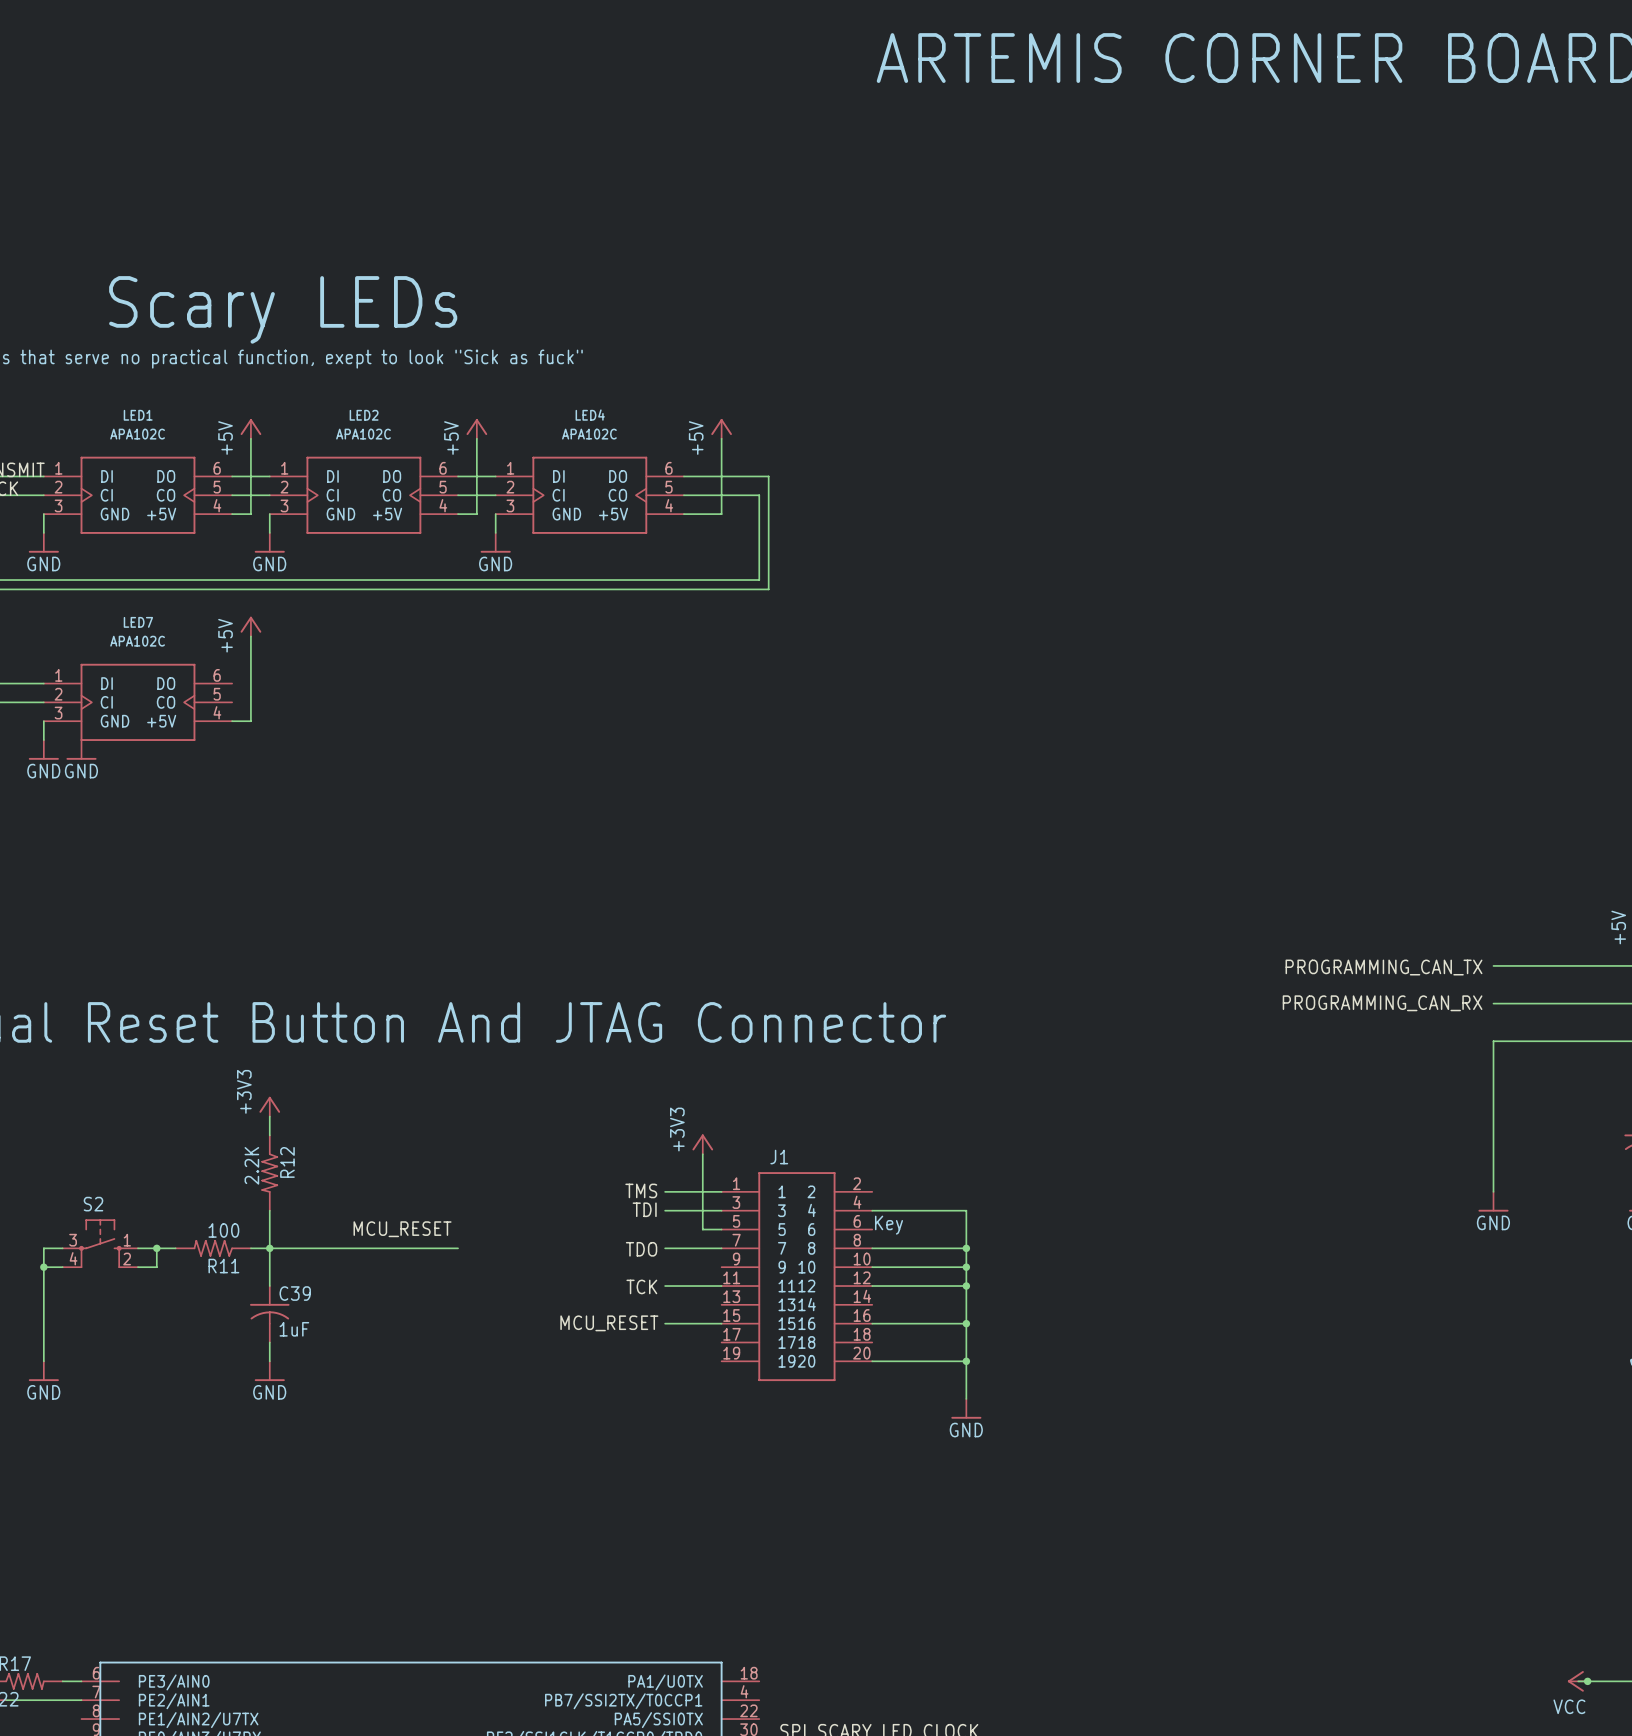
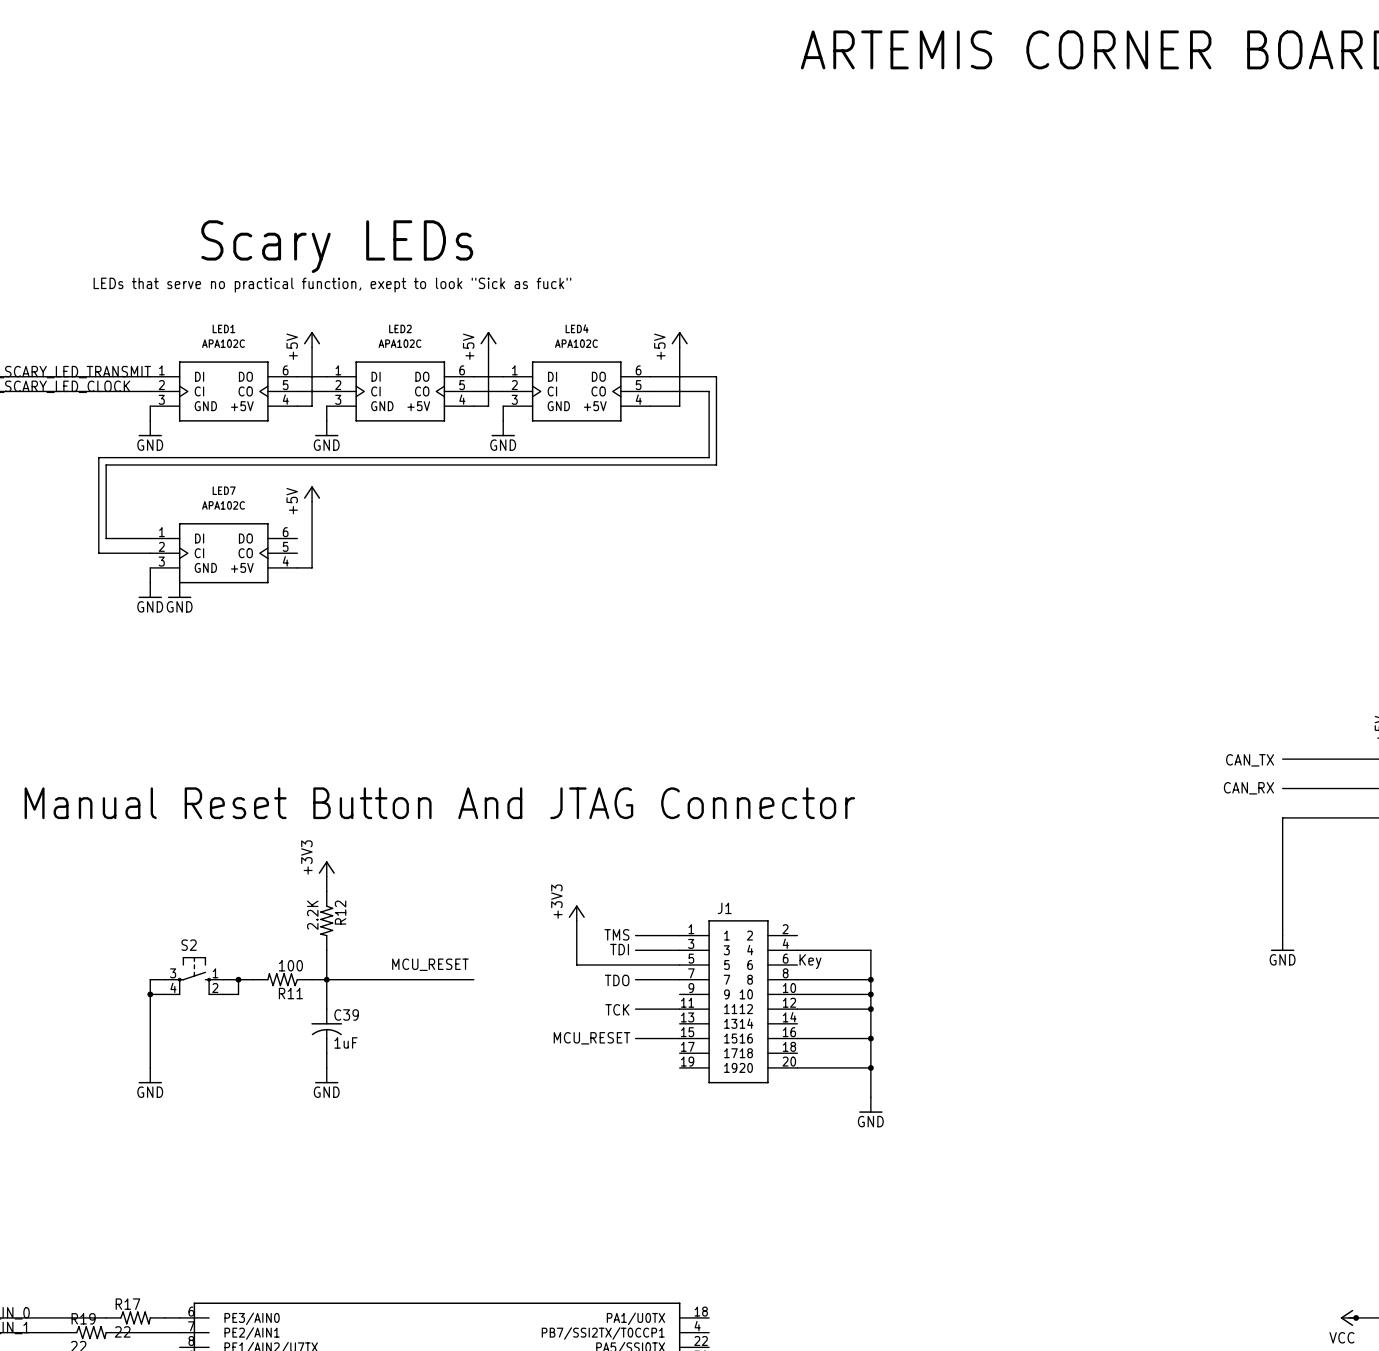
label: PROGRAMMING_CAN_TX (1383, 967) -> CAN_TX (1250, 760)
label: PROGRAMMING_CAN_RX (1382, 1003) -> CAN_RX (1248, 788)
power symbol position: +3V3 (702, 1144) -> +3V3 (576, 913)
wire: (702, 1154) (702, 1229) -> (576, 920) (576, 965) (664, 965)

